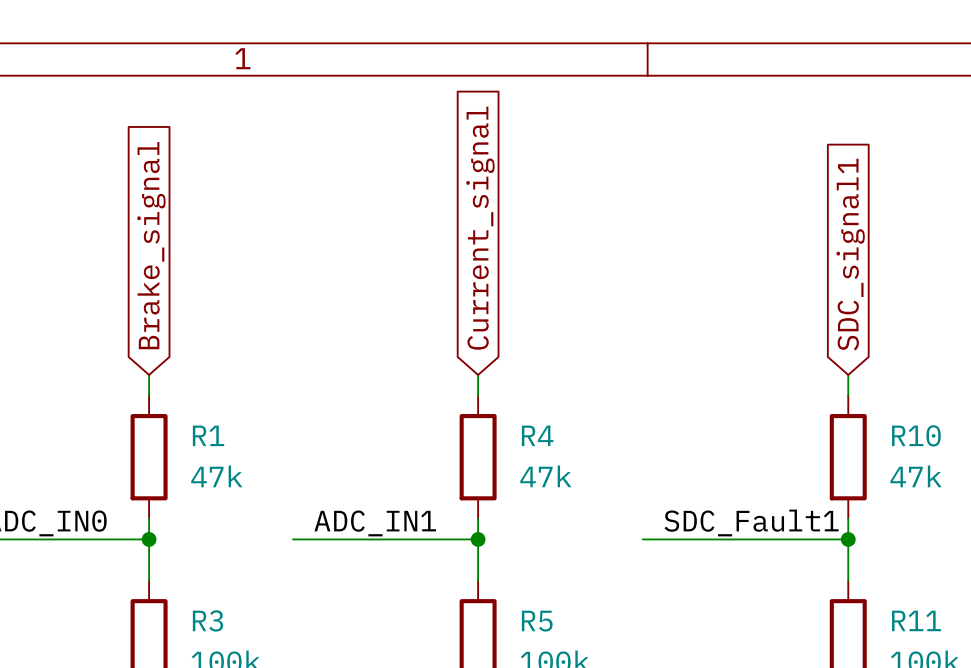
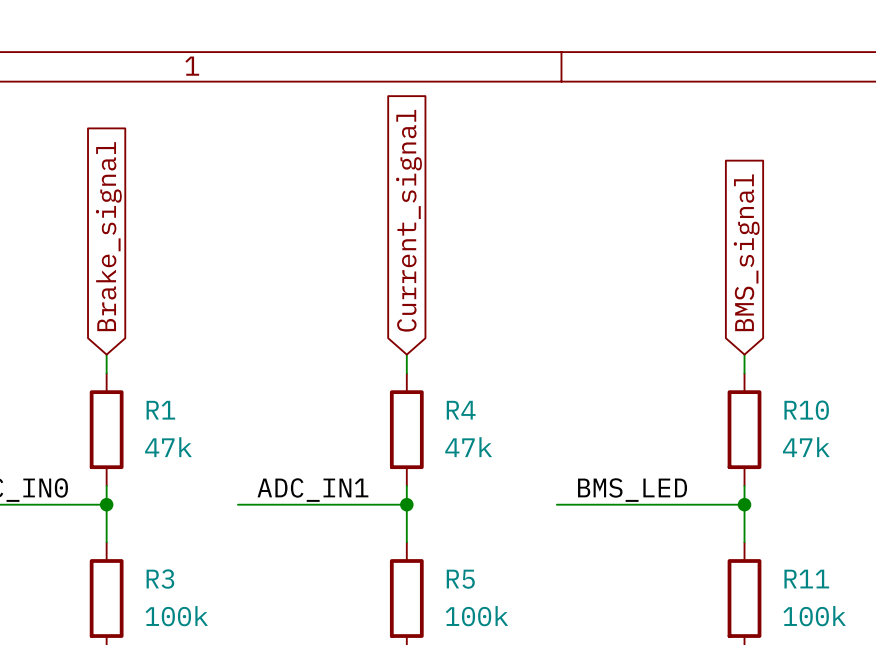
global label: SDC_signal1 (850, 254) -> BMS_signal (746, 252)
label: SDC_Fault1 (751, 522) -> BMS_LED (632, 490)

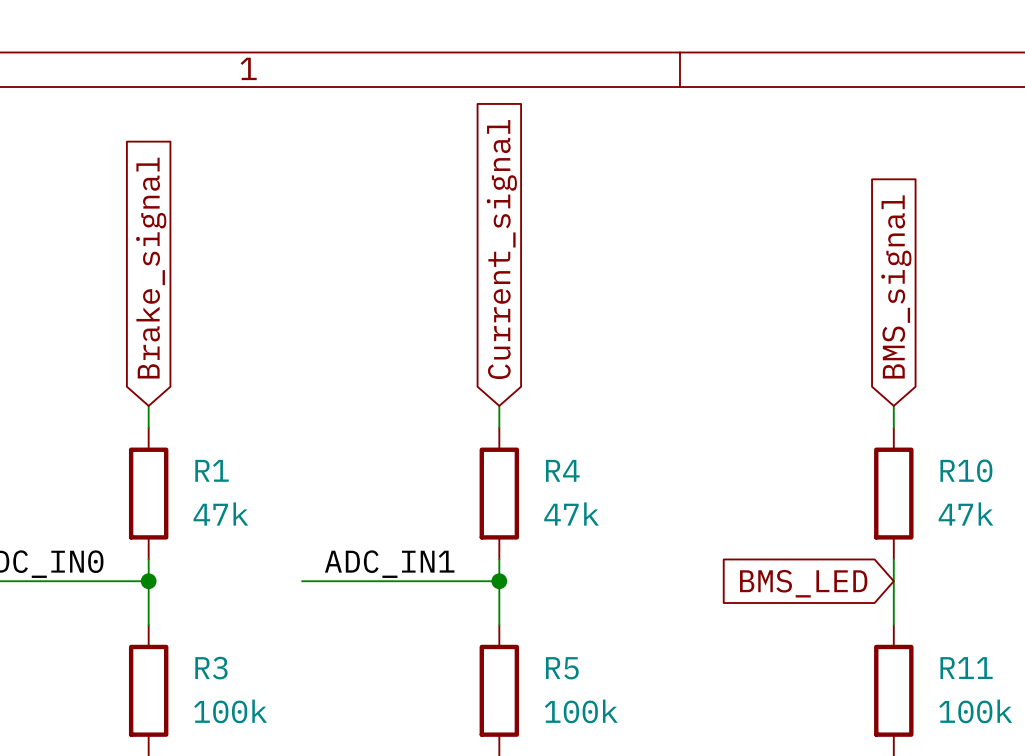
label: BMS_LED (632, 490) -> none
wire: (556, 504) (744, 504) -> none
junction: (744, 504) -> none
global label: none -> BMS_LED (803, 583)

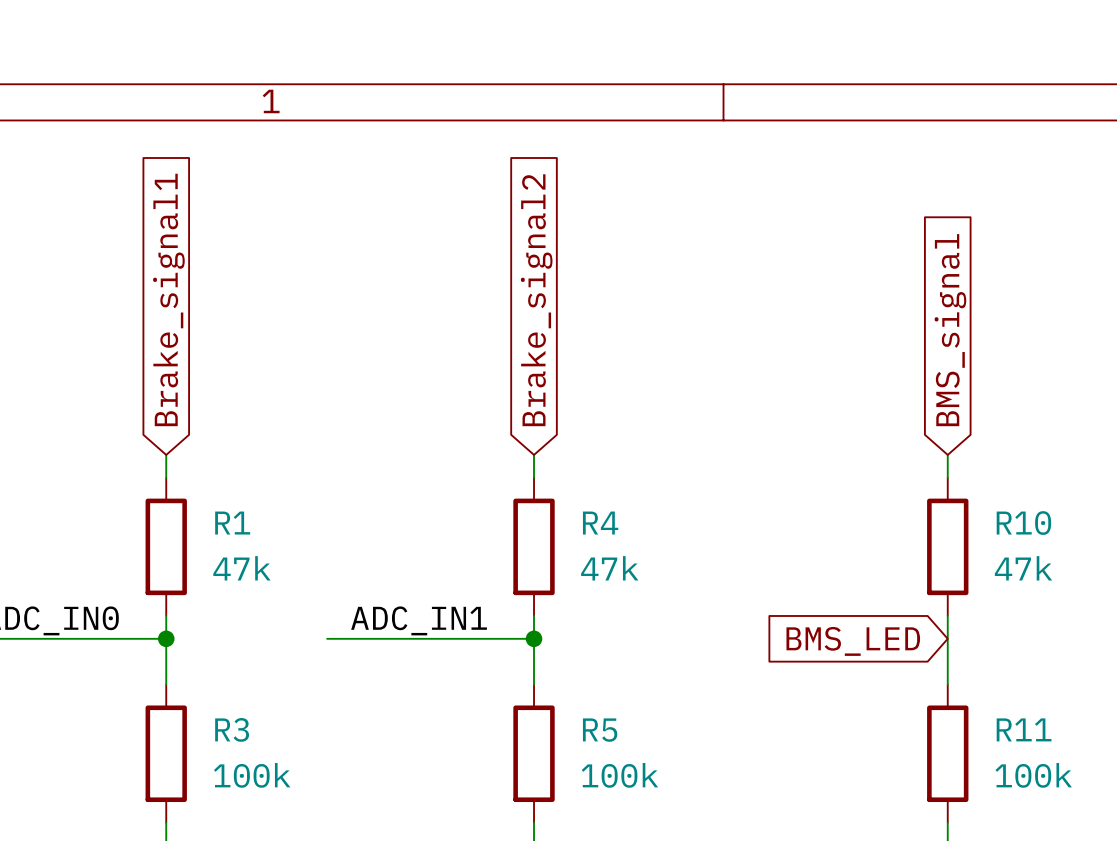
global label: Current_signal (501, 249) -> Brake_signal2 (536, 300)
global label: Brake_signal (151, 268) -> Brake_signal1 (168, 299)

